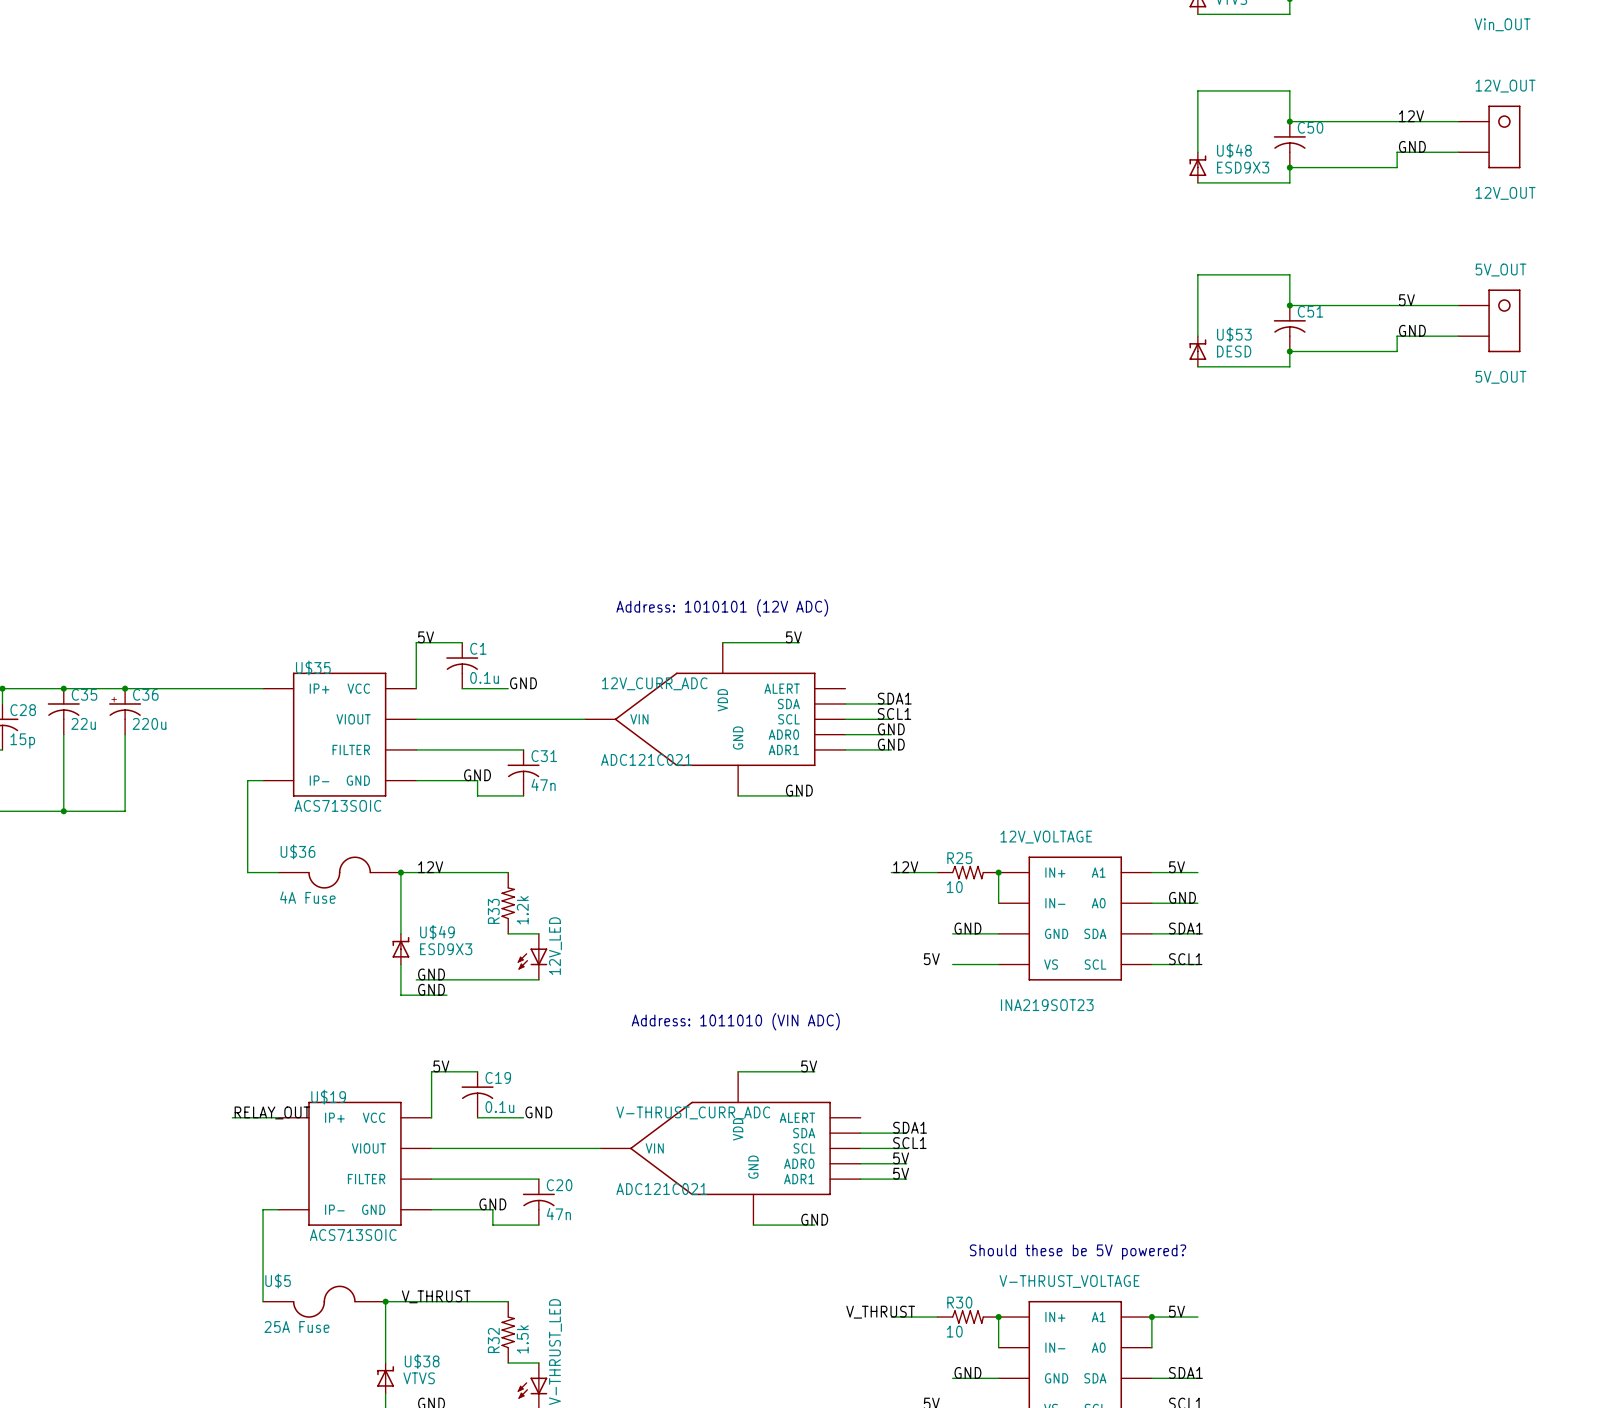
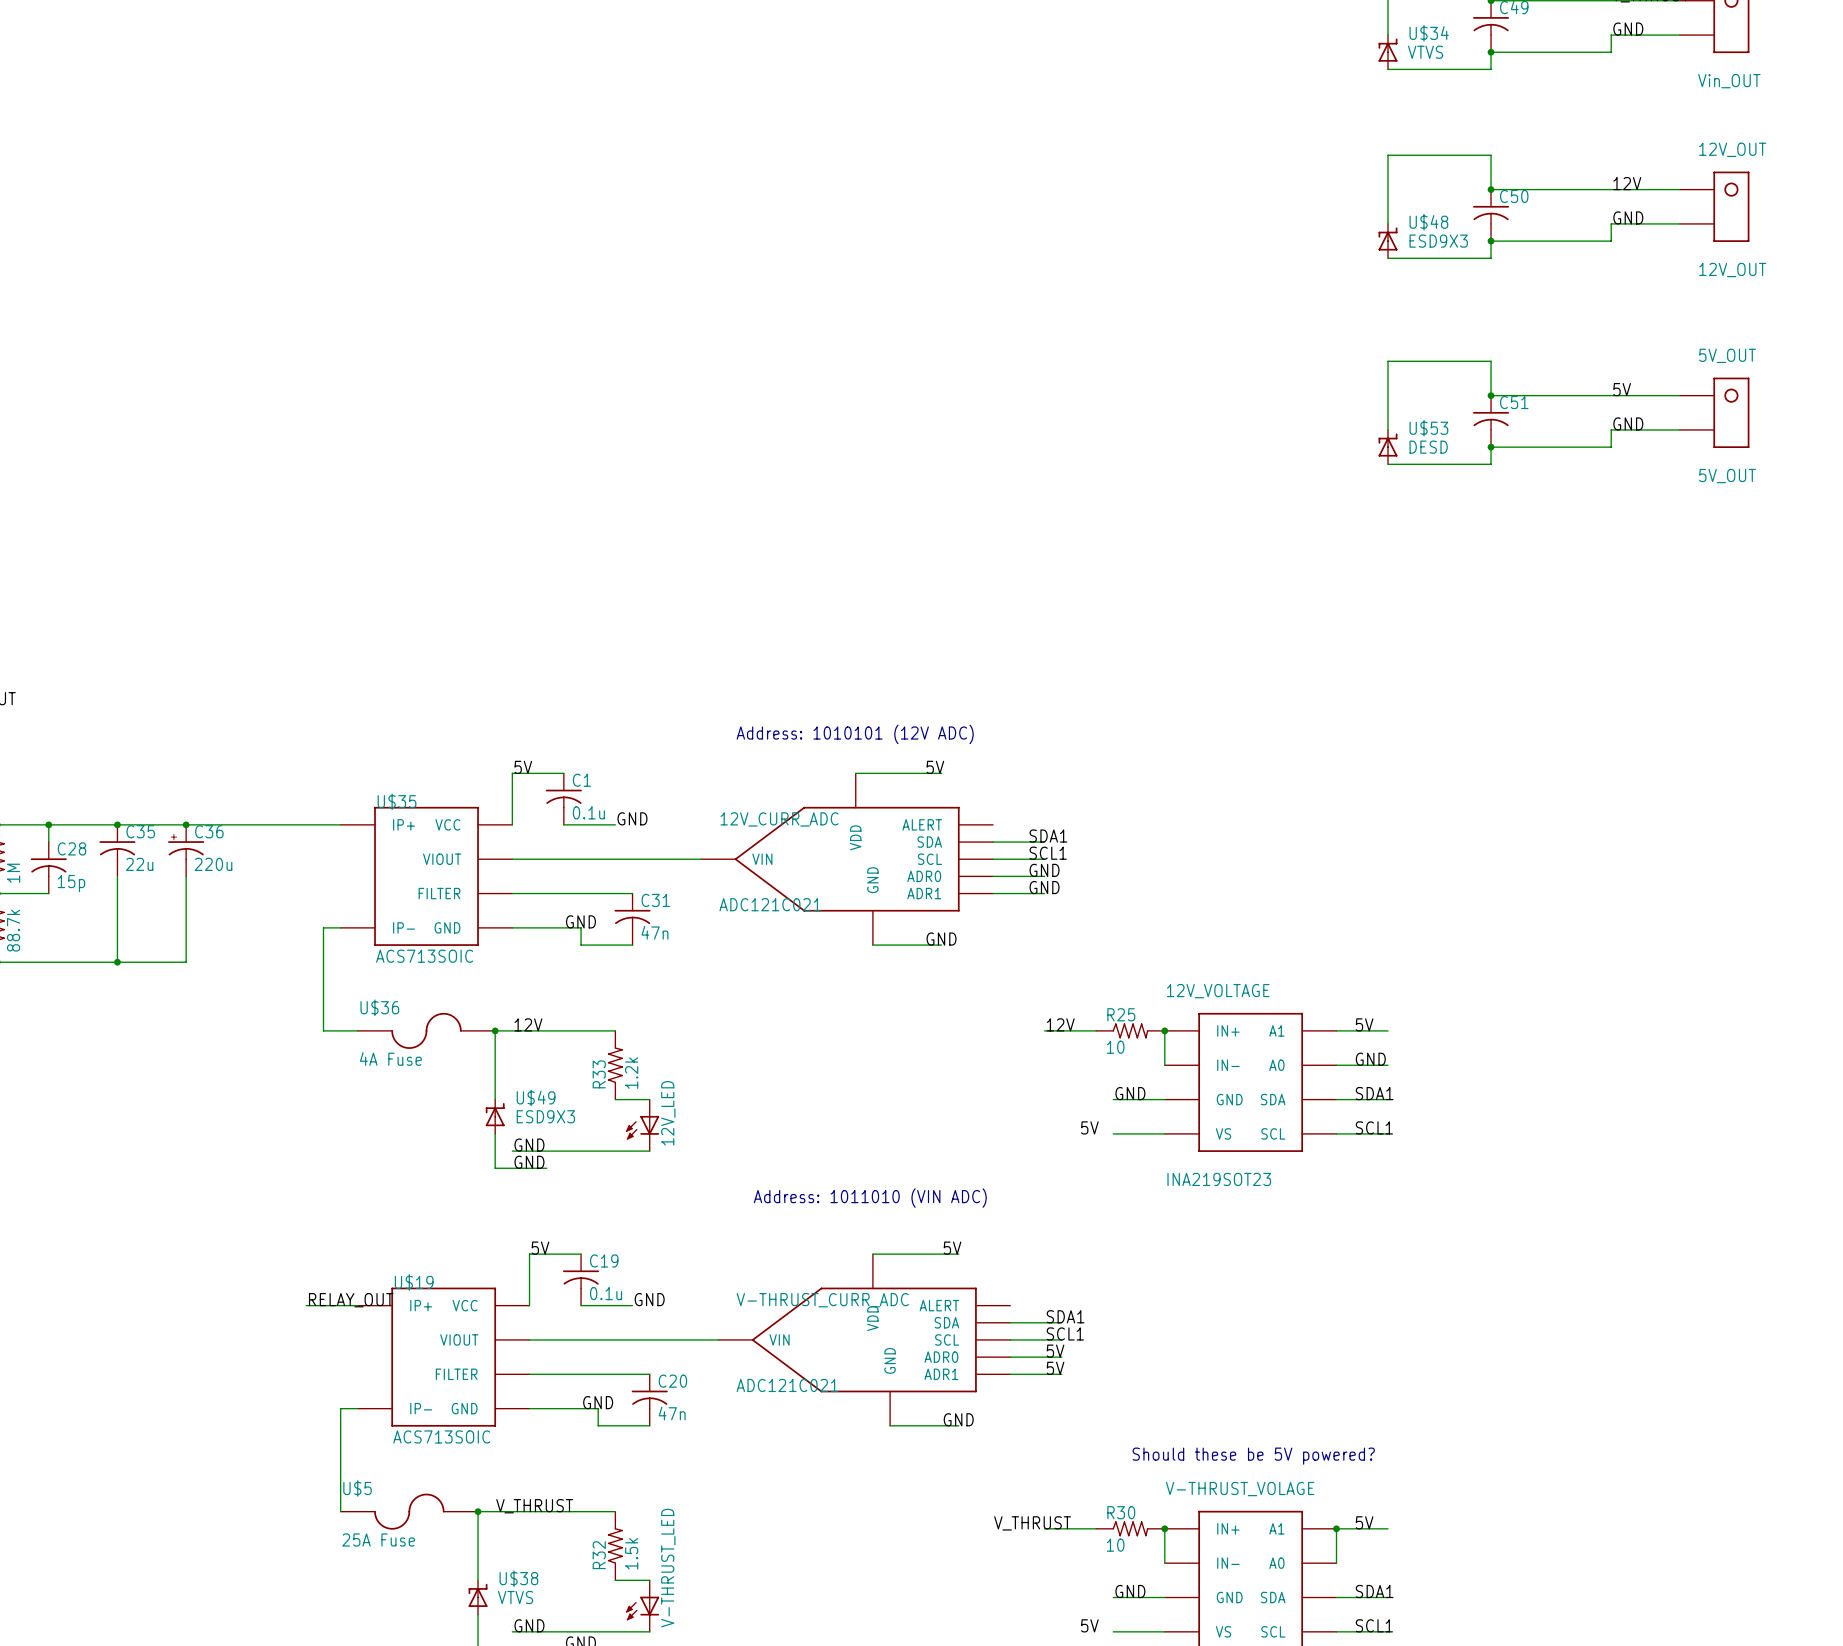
V-THRUST_VOLTAGE name: V-THRUST_VOLTAGE (1069, 1281) -> V-THRUST_VOLAGE (1240, 1489)

